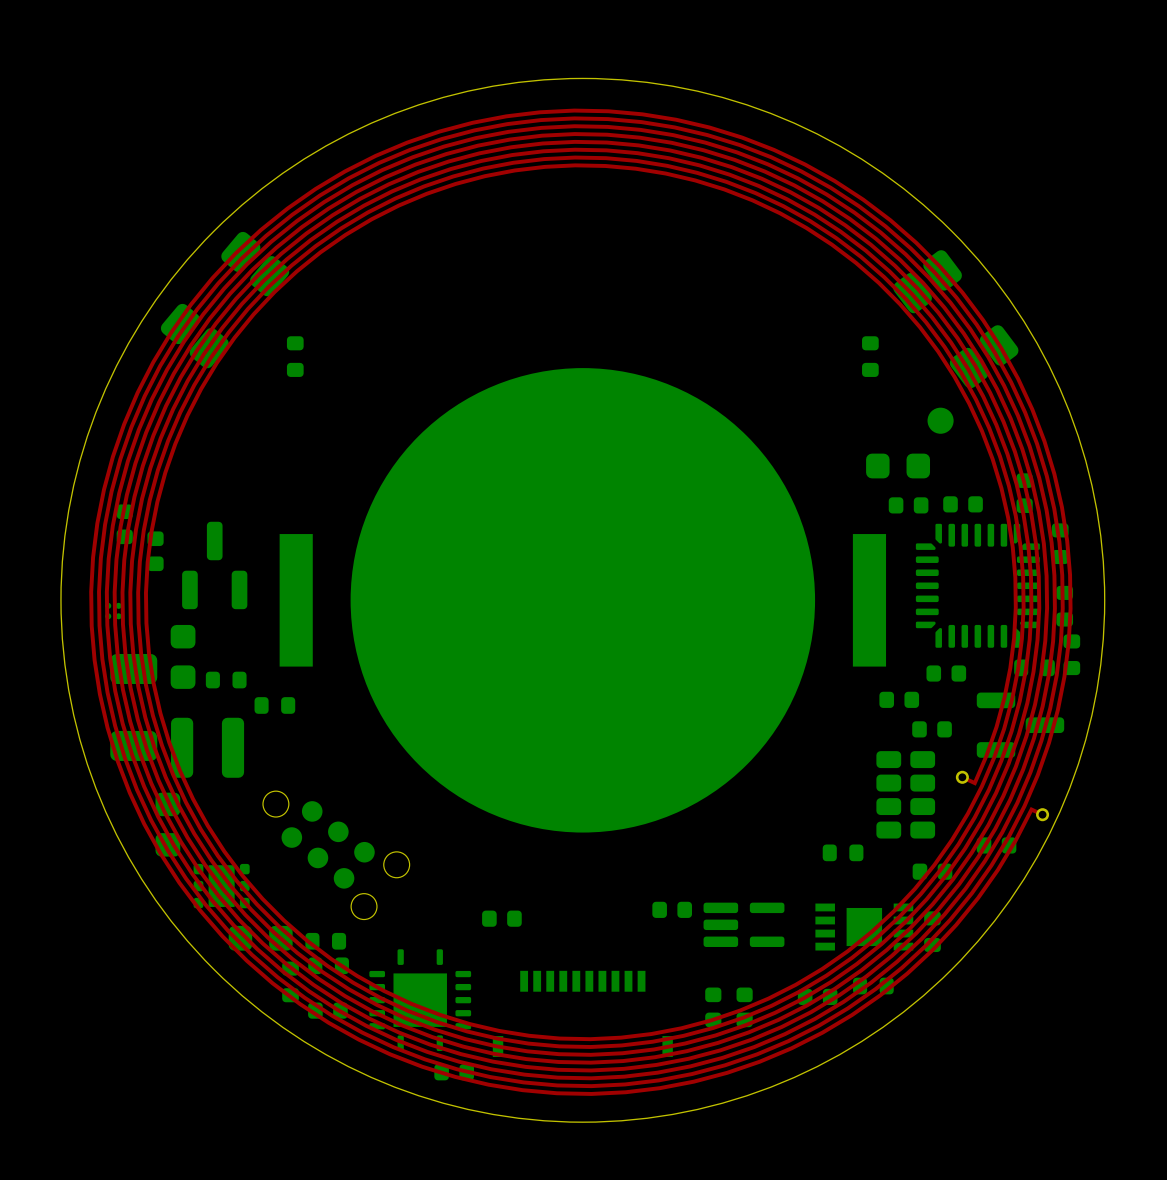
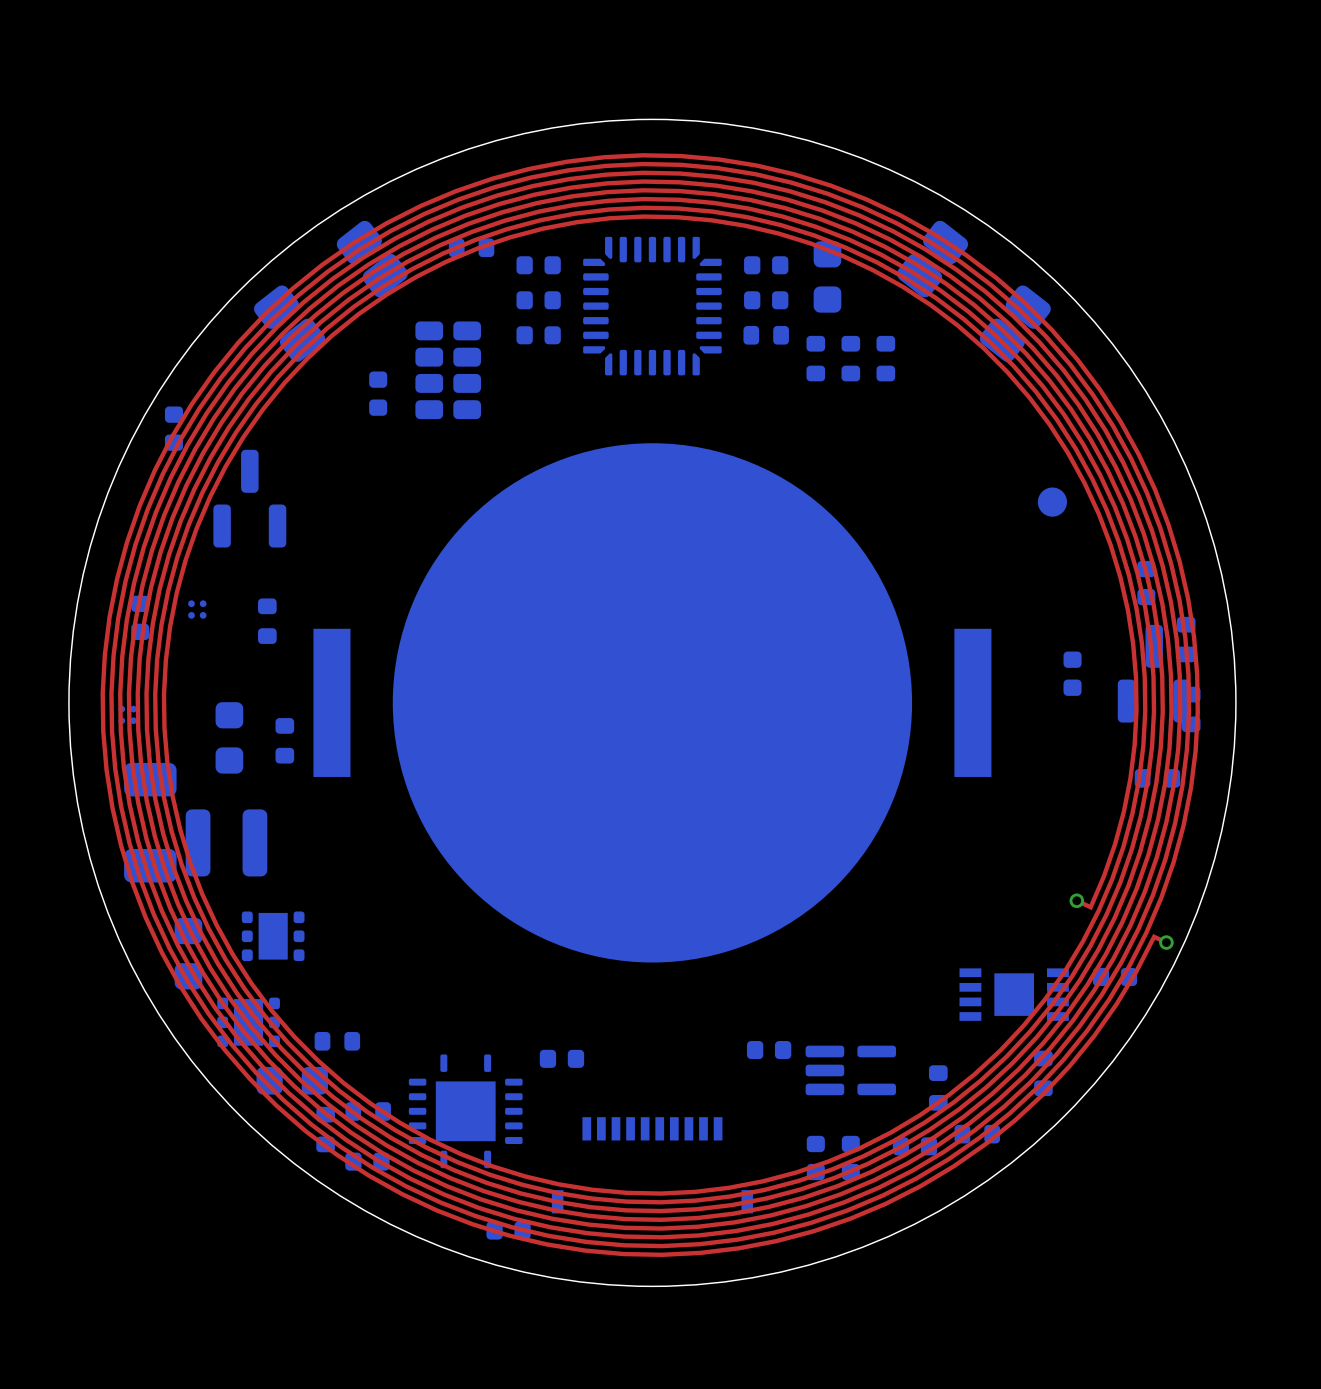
part: none -> (471, 247)
part: none -> (538, 265)
part: none -> (766, 265)
part: none -> (330, 291)
part: none -> (973, 291)
part: none -> (538, 300)
part: none -> (766, 300)
part: none -> (652, 306)
part: none -> (538, 335)
part: none -> (766, 335)
part: none -> (815, 358)
part: none -> (850, 358)
part: none -> (885, 358)
part: (225, 300) -> none
part: none -> (448, 370)
part: (955, 319) -> none
part: none -> (378, 393)
part: none -> (173, 428)
part: (295, 356) -> none
part: (870, 356) -> none
part rotation: 0° (898, 466) -> 90° clockwise (827, 276)
part position: (898, 466) -> (827, 276)
part: (963, 504) -> none
part: (908, 505) -> none
part: none -> (197, 609)
part footprint: [915, 523, 1040, 648] -> [1063, 651, 1082, 696]
part: none -> (267, 621)
part: (155, 551) -> none
part position: (214, 565) -> (249, 498)
part: none -> (284, 740)
part: (1071, 654) -> none
part position: (183, 656) -> (229, 737)
part: (946, 673) -> none
part: (226, 680) -> none
part: (899, 699) -> none
part: (274, 705) -> none
part rotation: 0° (1020, 725) -> 90° counterclockwise (1154, 673)
part position: (1020, 725) -> (1154, 673)
part: (932, 729) -> none
part position: (207, 747) -> (226, 842)
part: (905, 794) -> none
part: none -> (273, 936)
part rotation: 0° (843, 852) -> 90° clockwise (938, 1087)
part position: (843, 852) -> (938, 1087)
part: (336, 855) -> none
part: (932, 871) -> none
part position: (672, 909) -> (769, 1050)
part position: (743, 924) -> (850, 1070)
part position: (864, 927) -> (1014, 994)
part position: (325, 941) -> (337, 1041)
part position: (420, 1000) -> (465, 1111)
part: (713, 1007) -> none
part: none -> (815, 1157)
part: (744, 1007) -> none
part: none -> (850, 1157)

